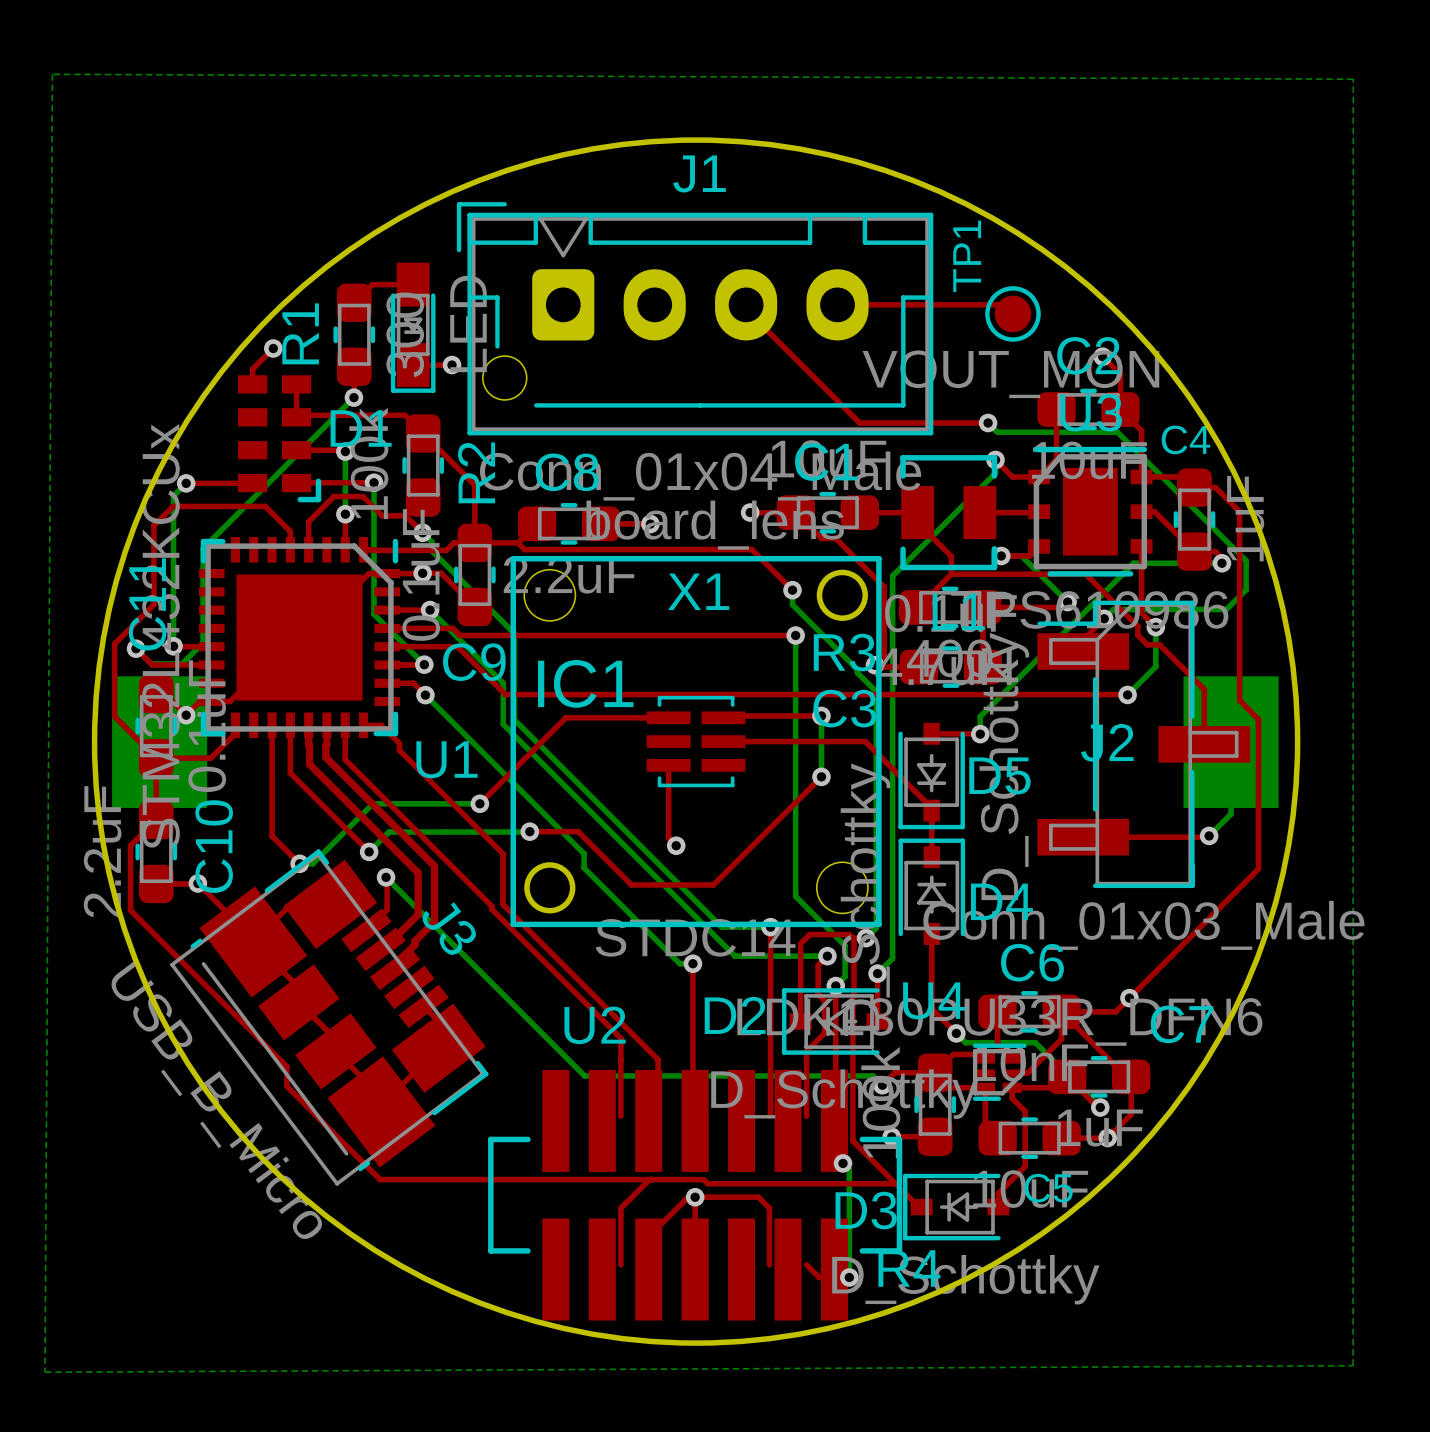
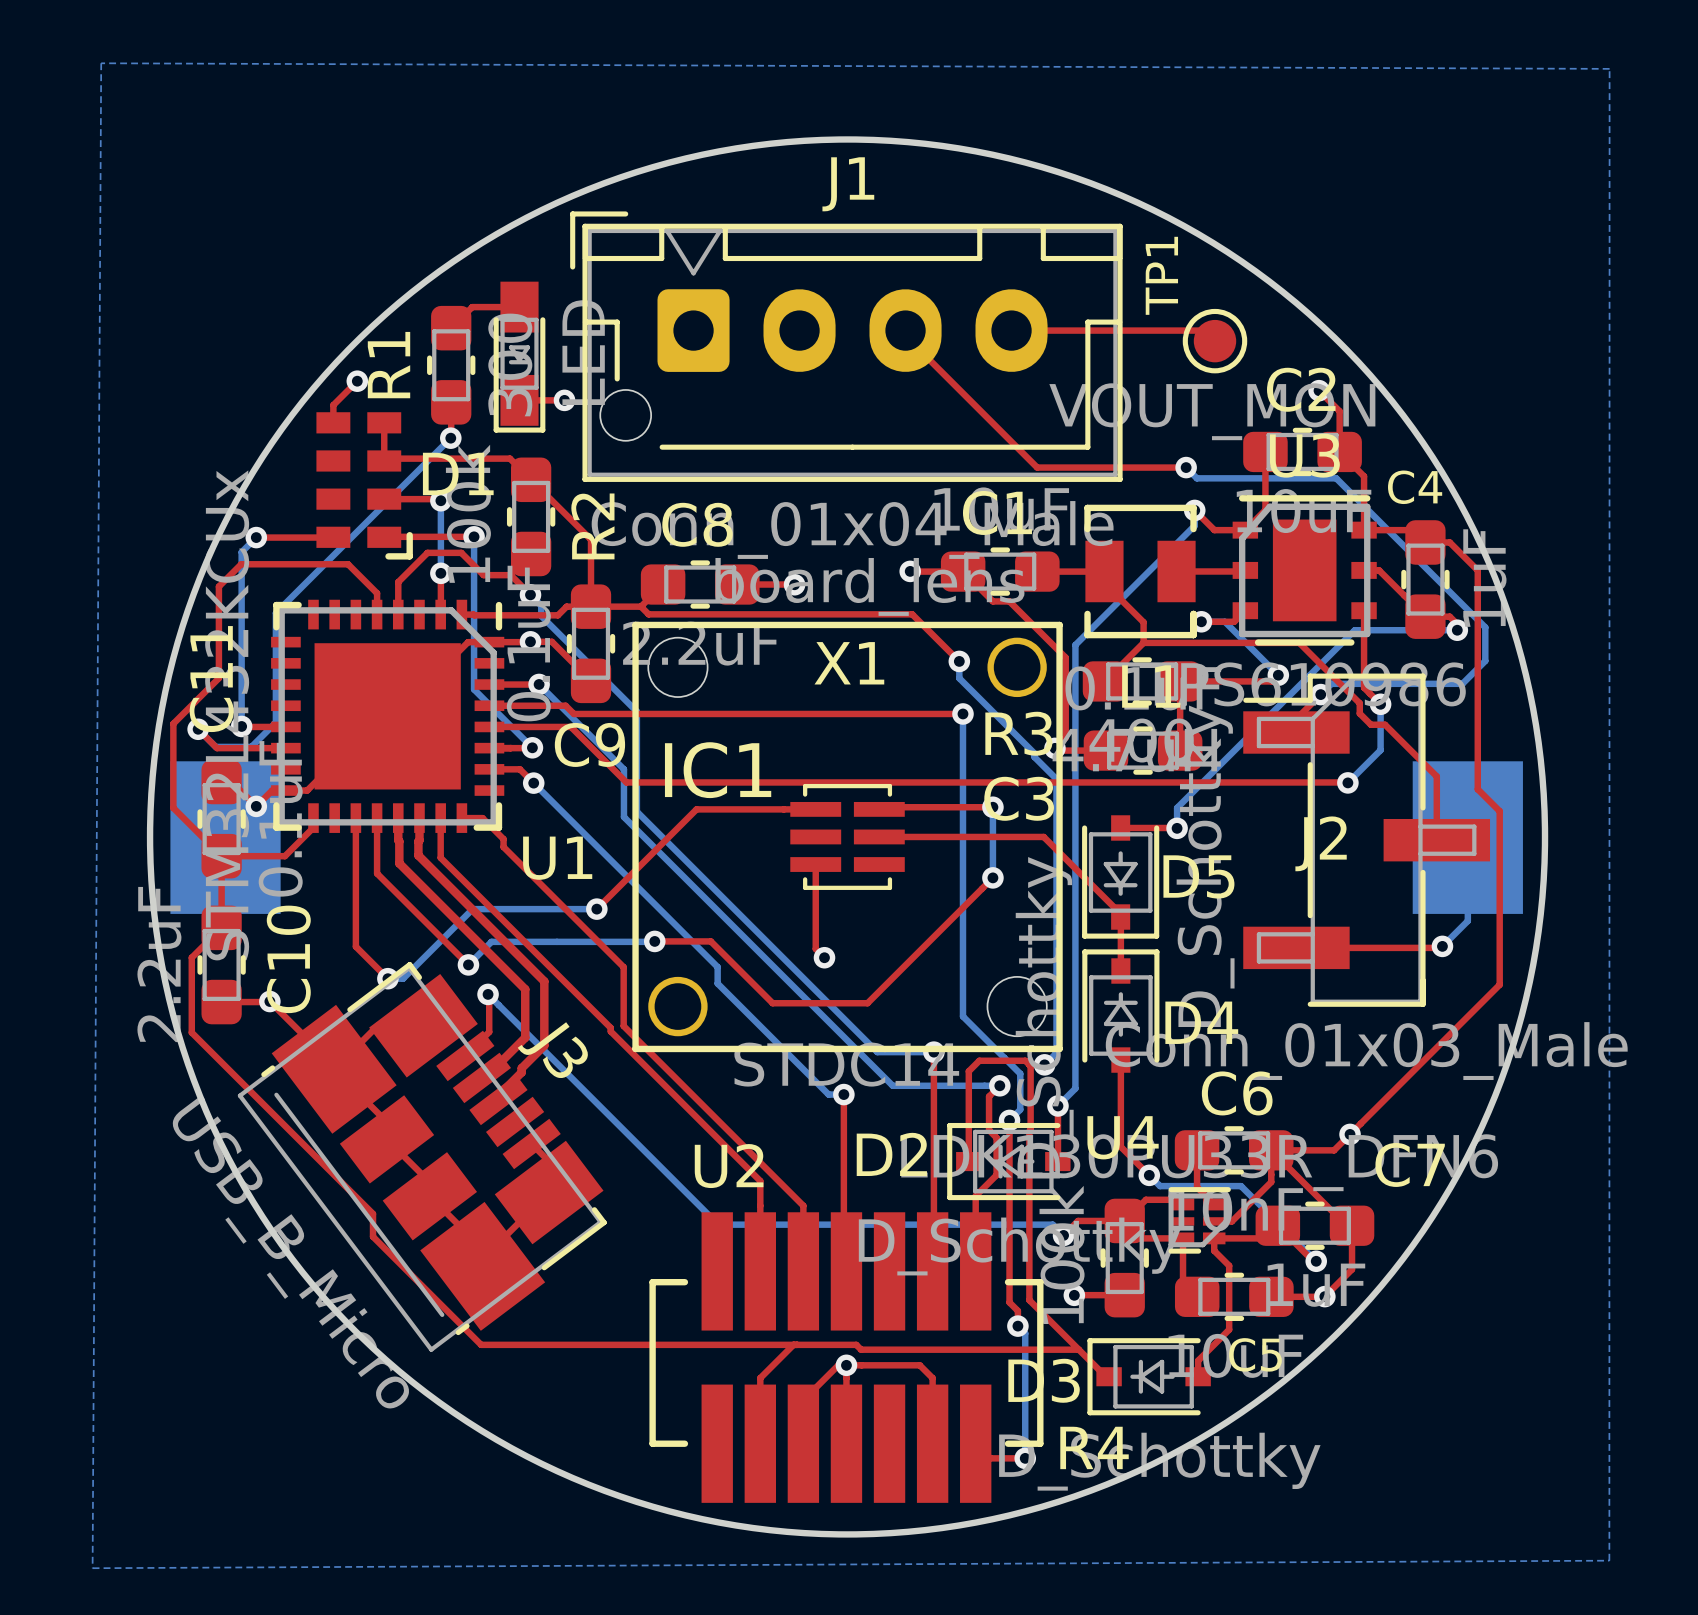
U2 footprint: [488, 1069, 903, 1321] -> [649, 1212, 1044, 1503]

